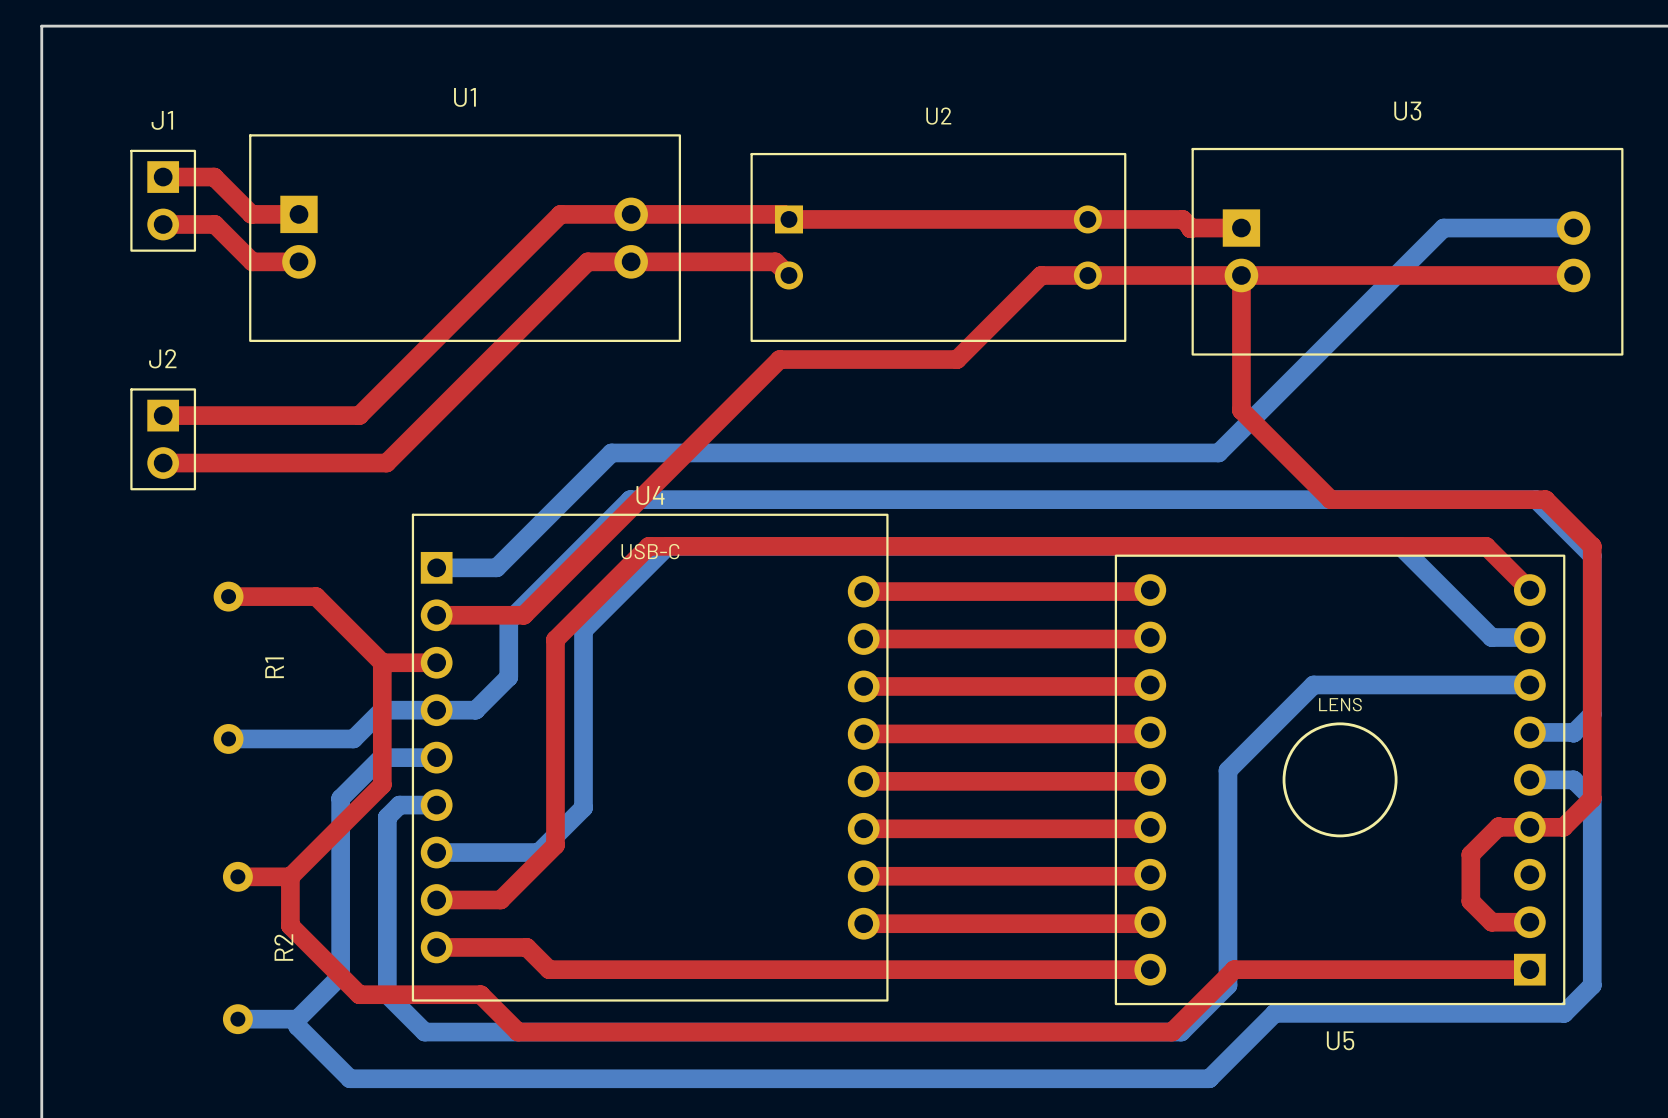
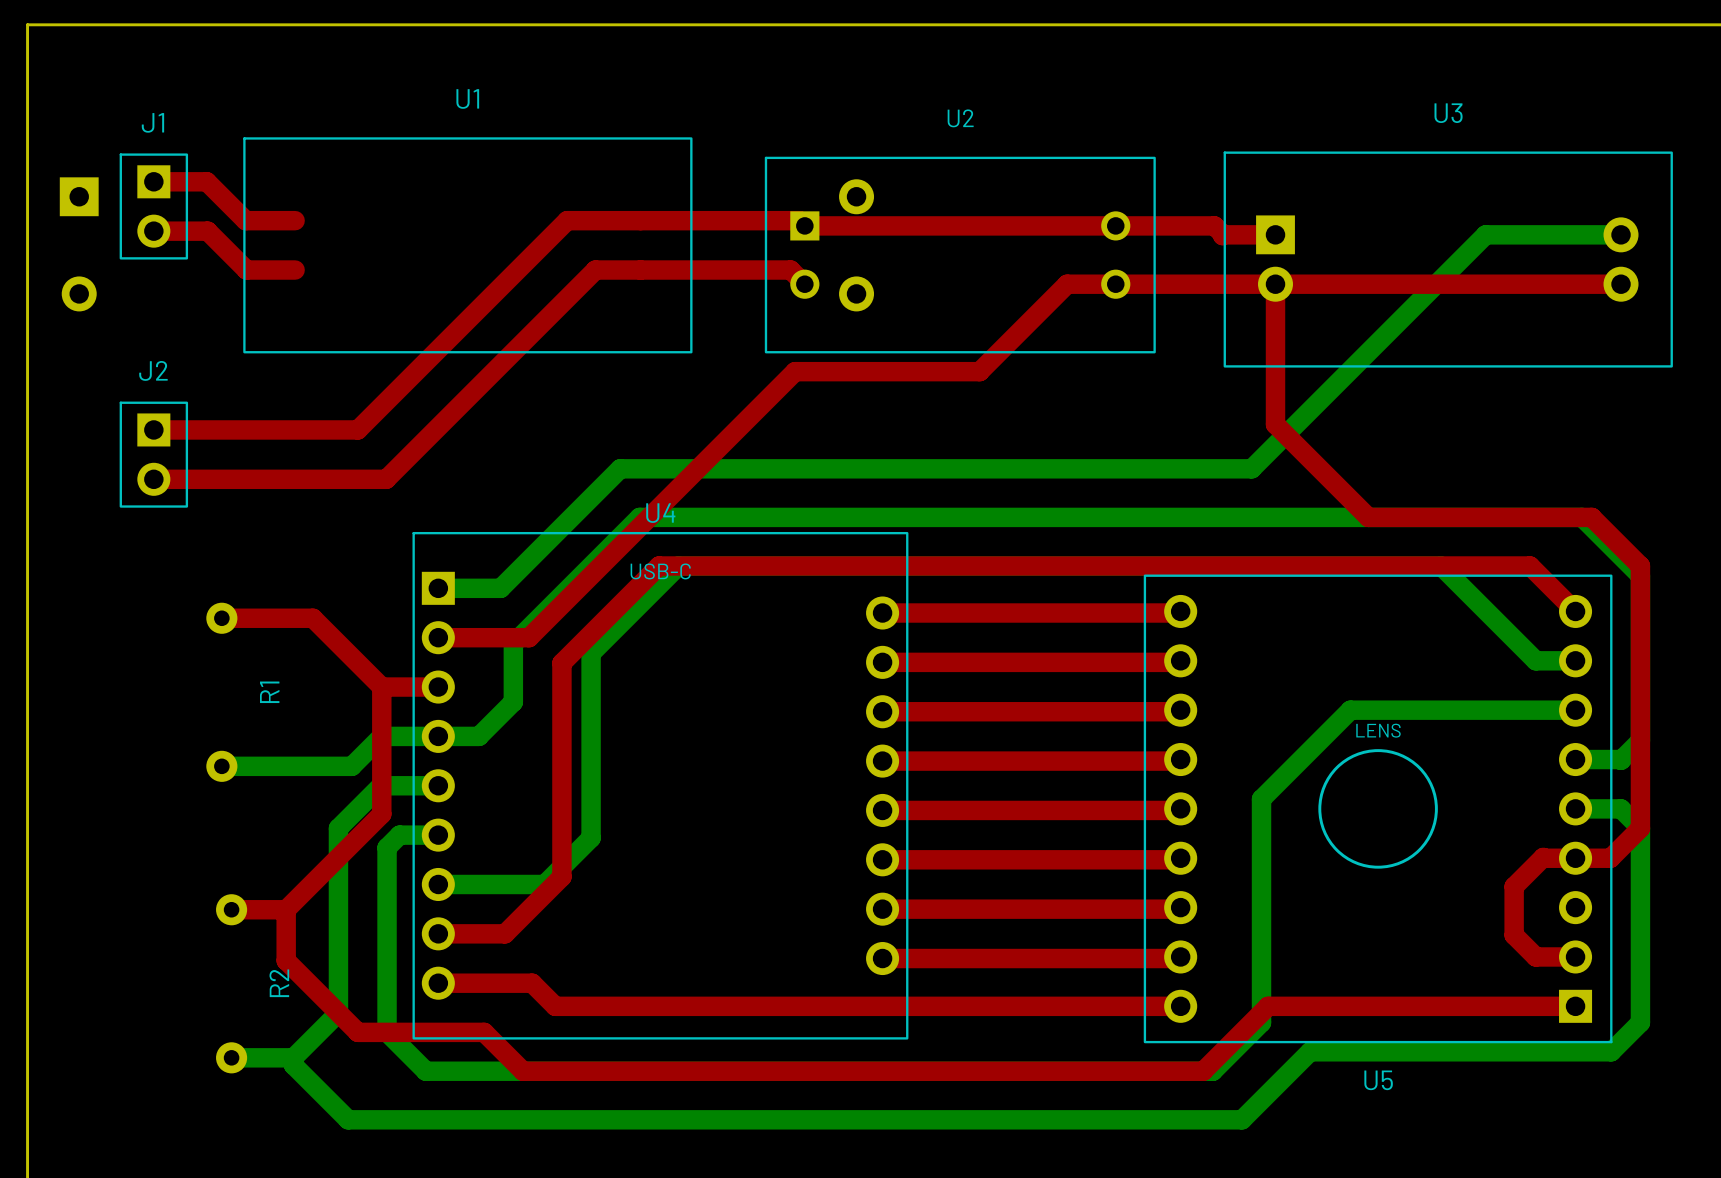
U1 footprint: [249, 134, 682, 342] -> [59, 137, 875, 354]

